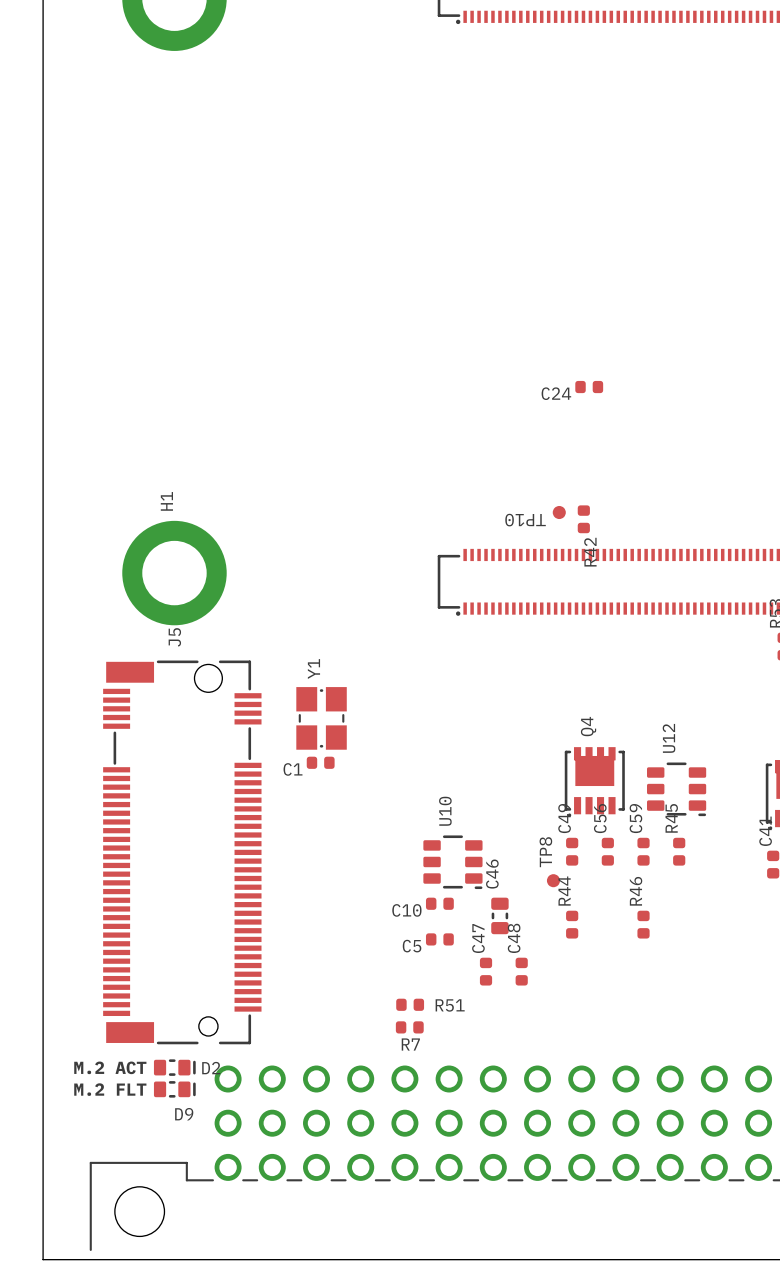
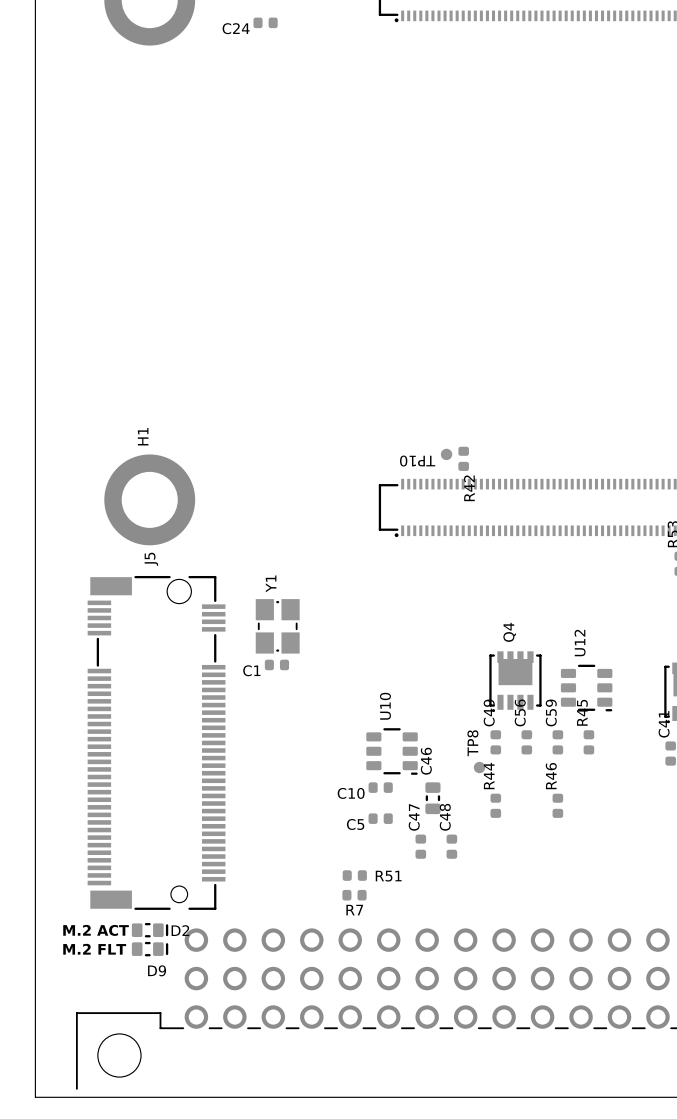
C24 position: (589, 387) -> (265, 22)
TP10 position: (559, 512) -> (446, 454)
R42 position: (583, 519) -> (463, 458)

